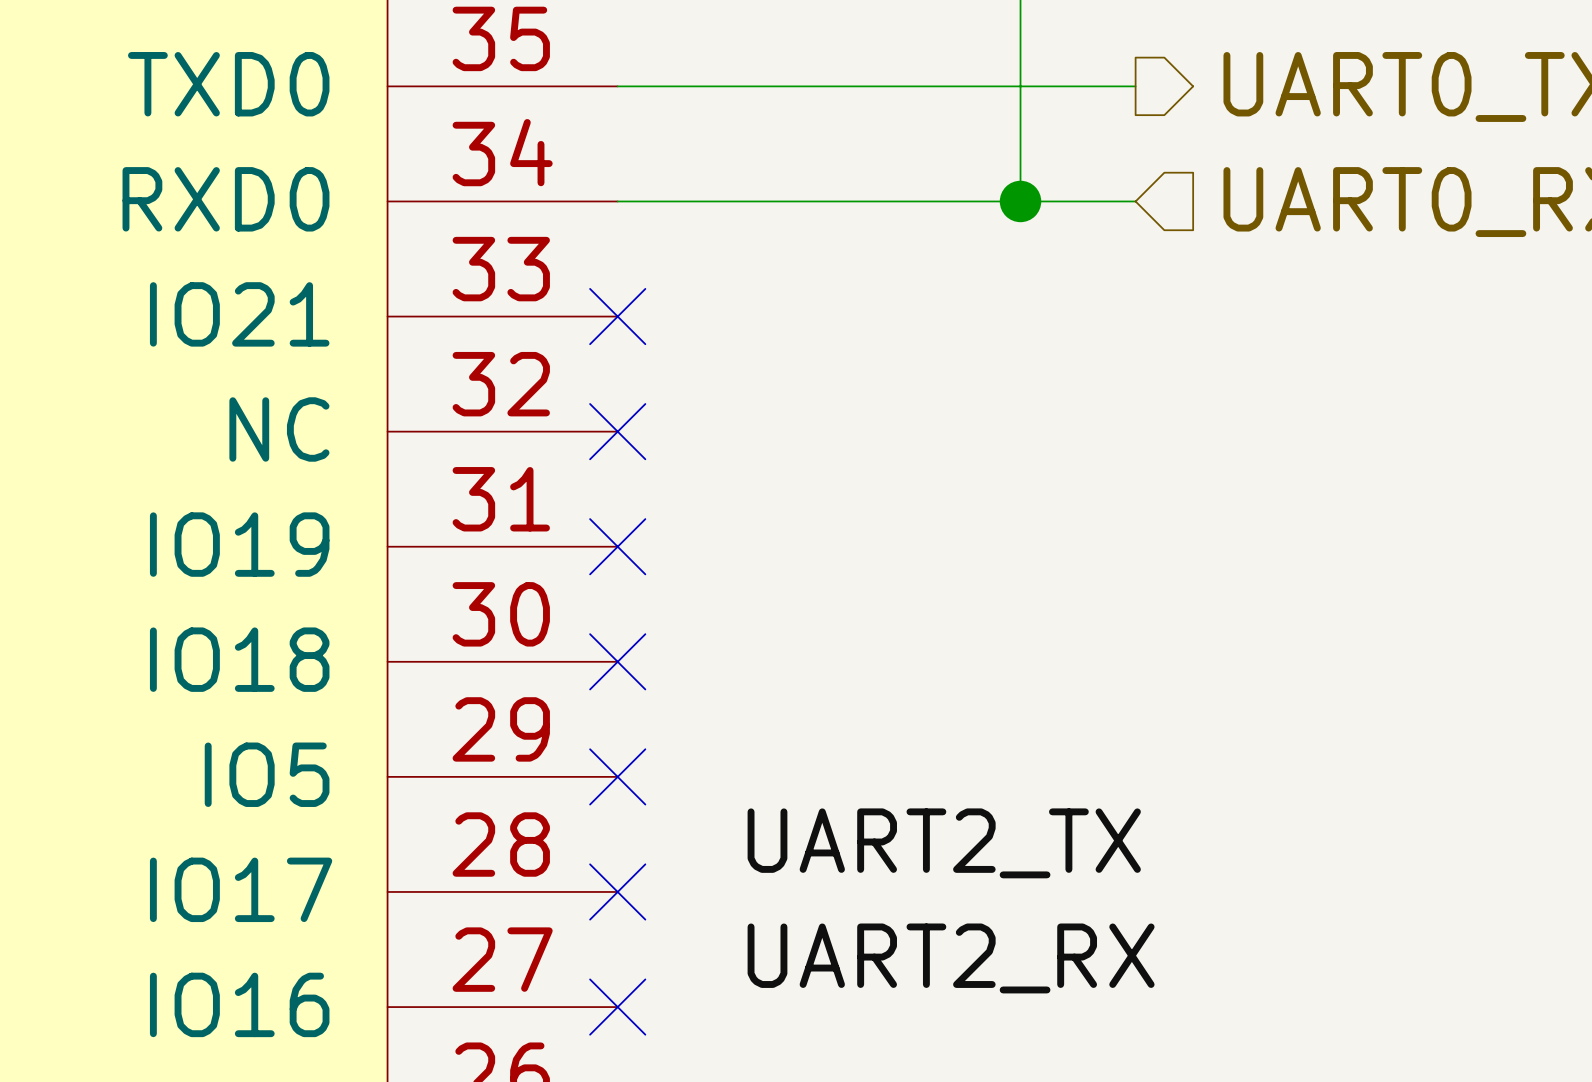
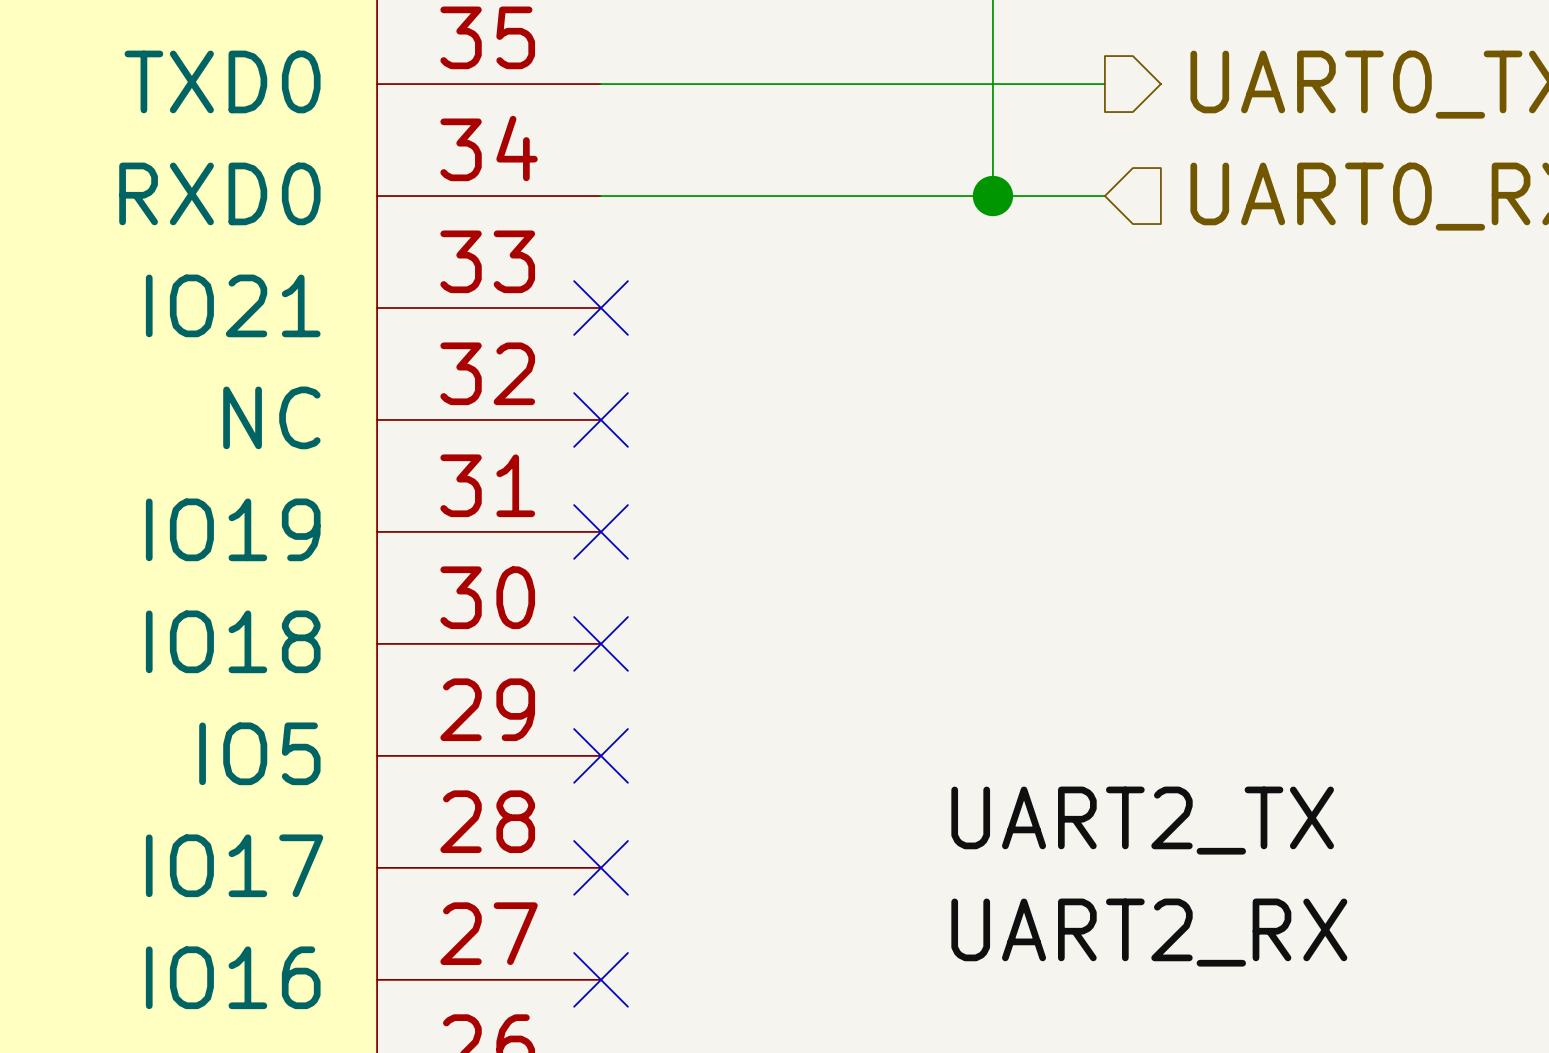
label position: UART2_TX (944, 843) -> UART2_TX (1142, 820)
label position: UART2_RX (951, 958) -> UART2_RX (1149, 932)

